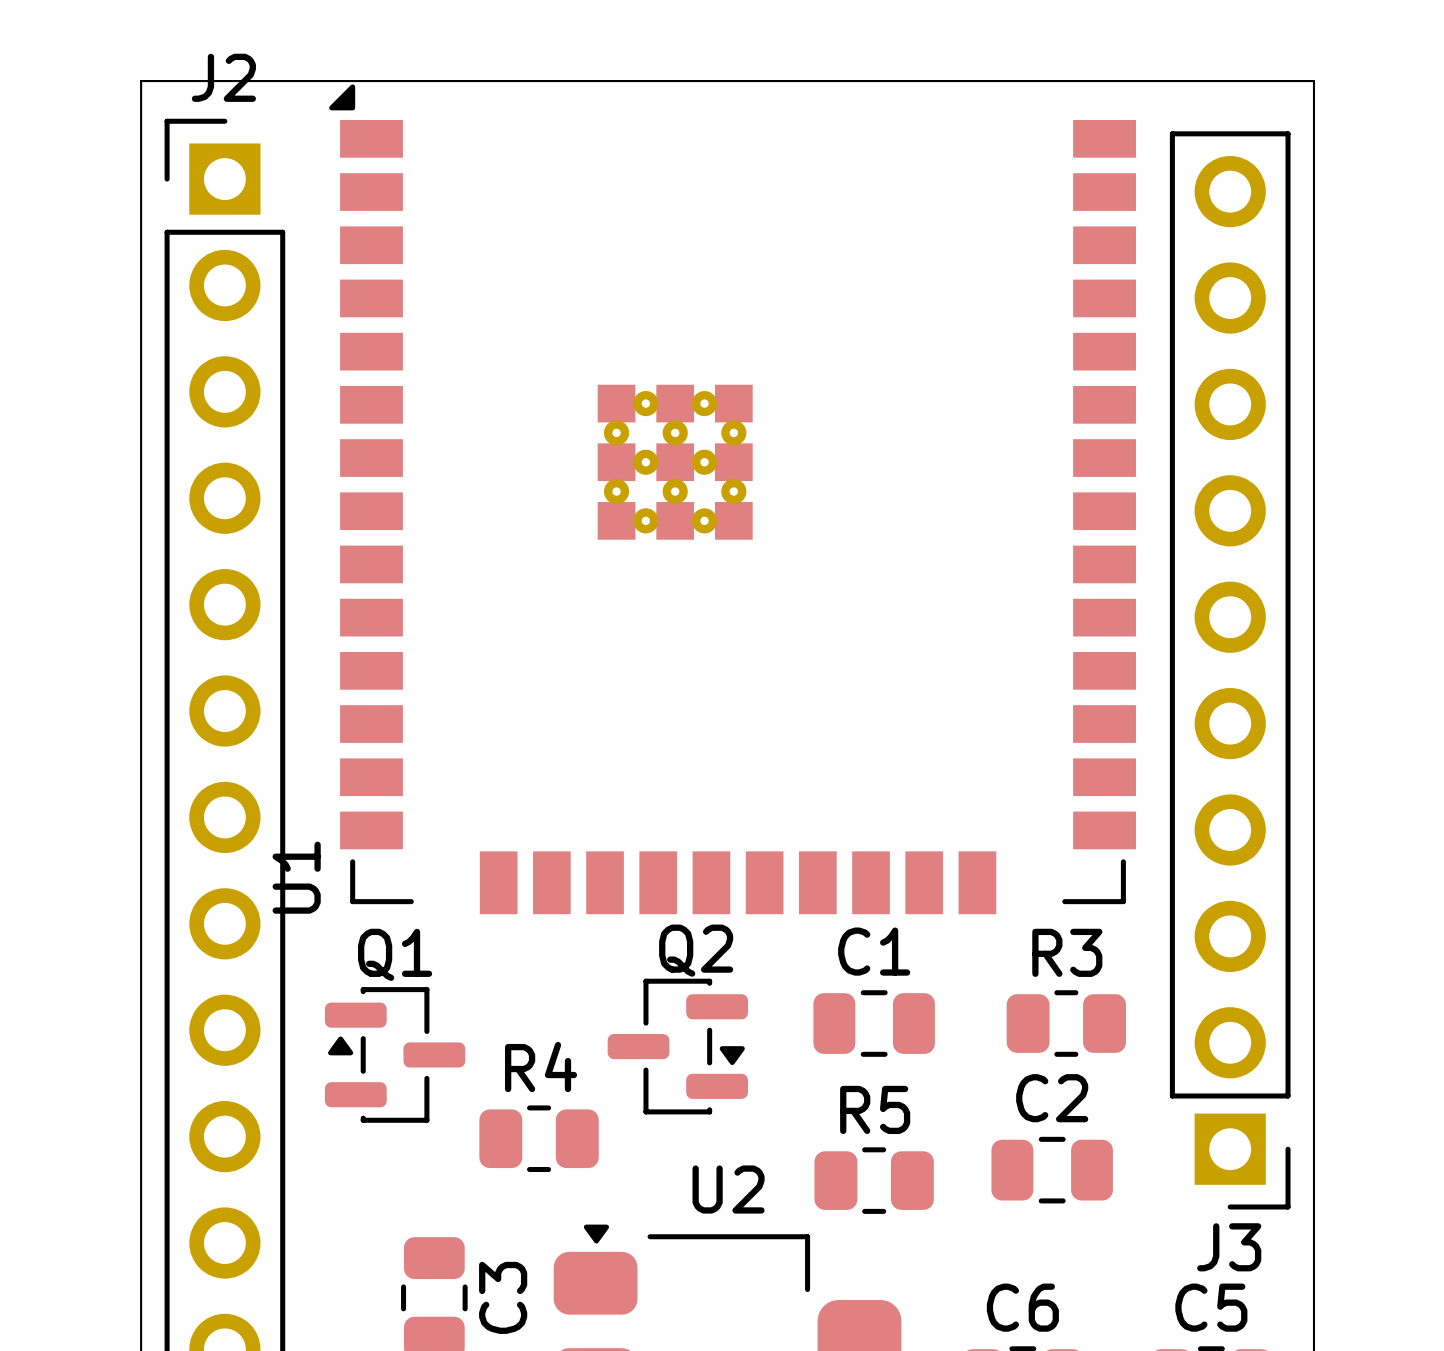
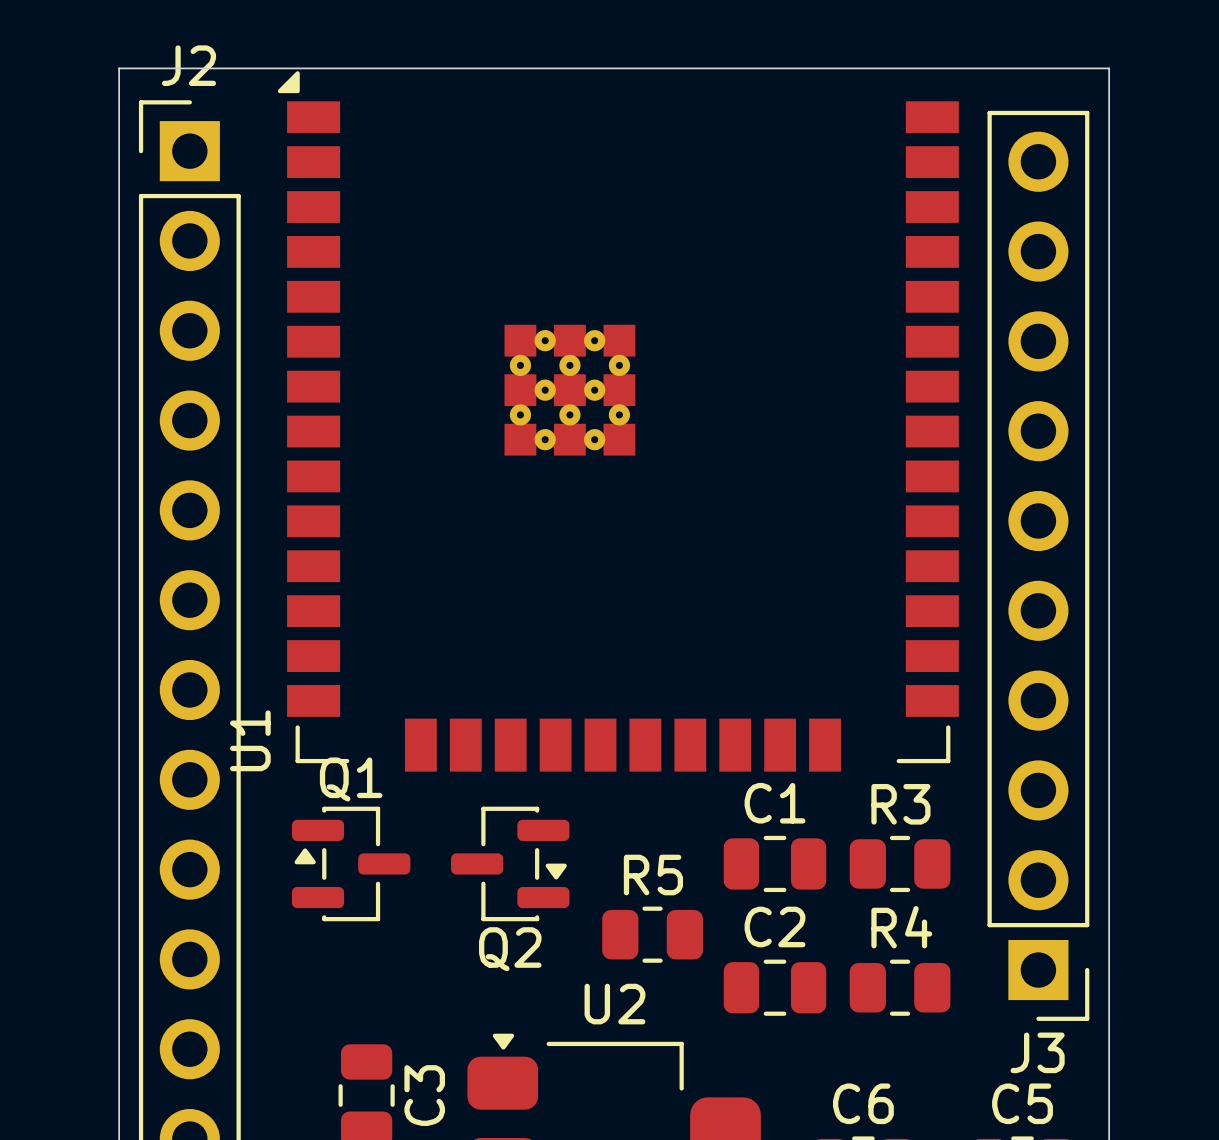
Q2 name position: Q2 (696, 950) -> Q2 (510, 949)
C1 position: (874, 1023) -> (775, 863)
Q2 position: (677, 1046) -> (510, 863)
Q1 position: (395, 1054) -> (351, 863)
R4 position: (539, 1138) -> (900, 987)
C2 position: (1052, 1170) -> (775, 987)
R5 position: (874, 1180) -> (652, 934)

